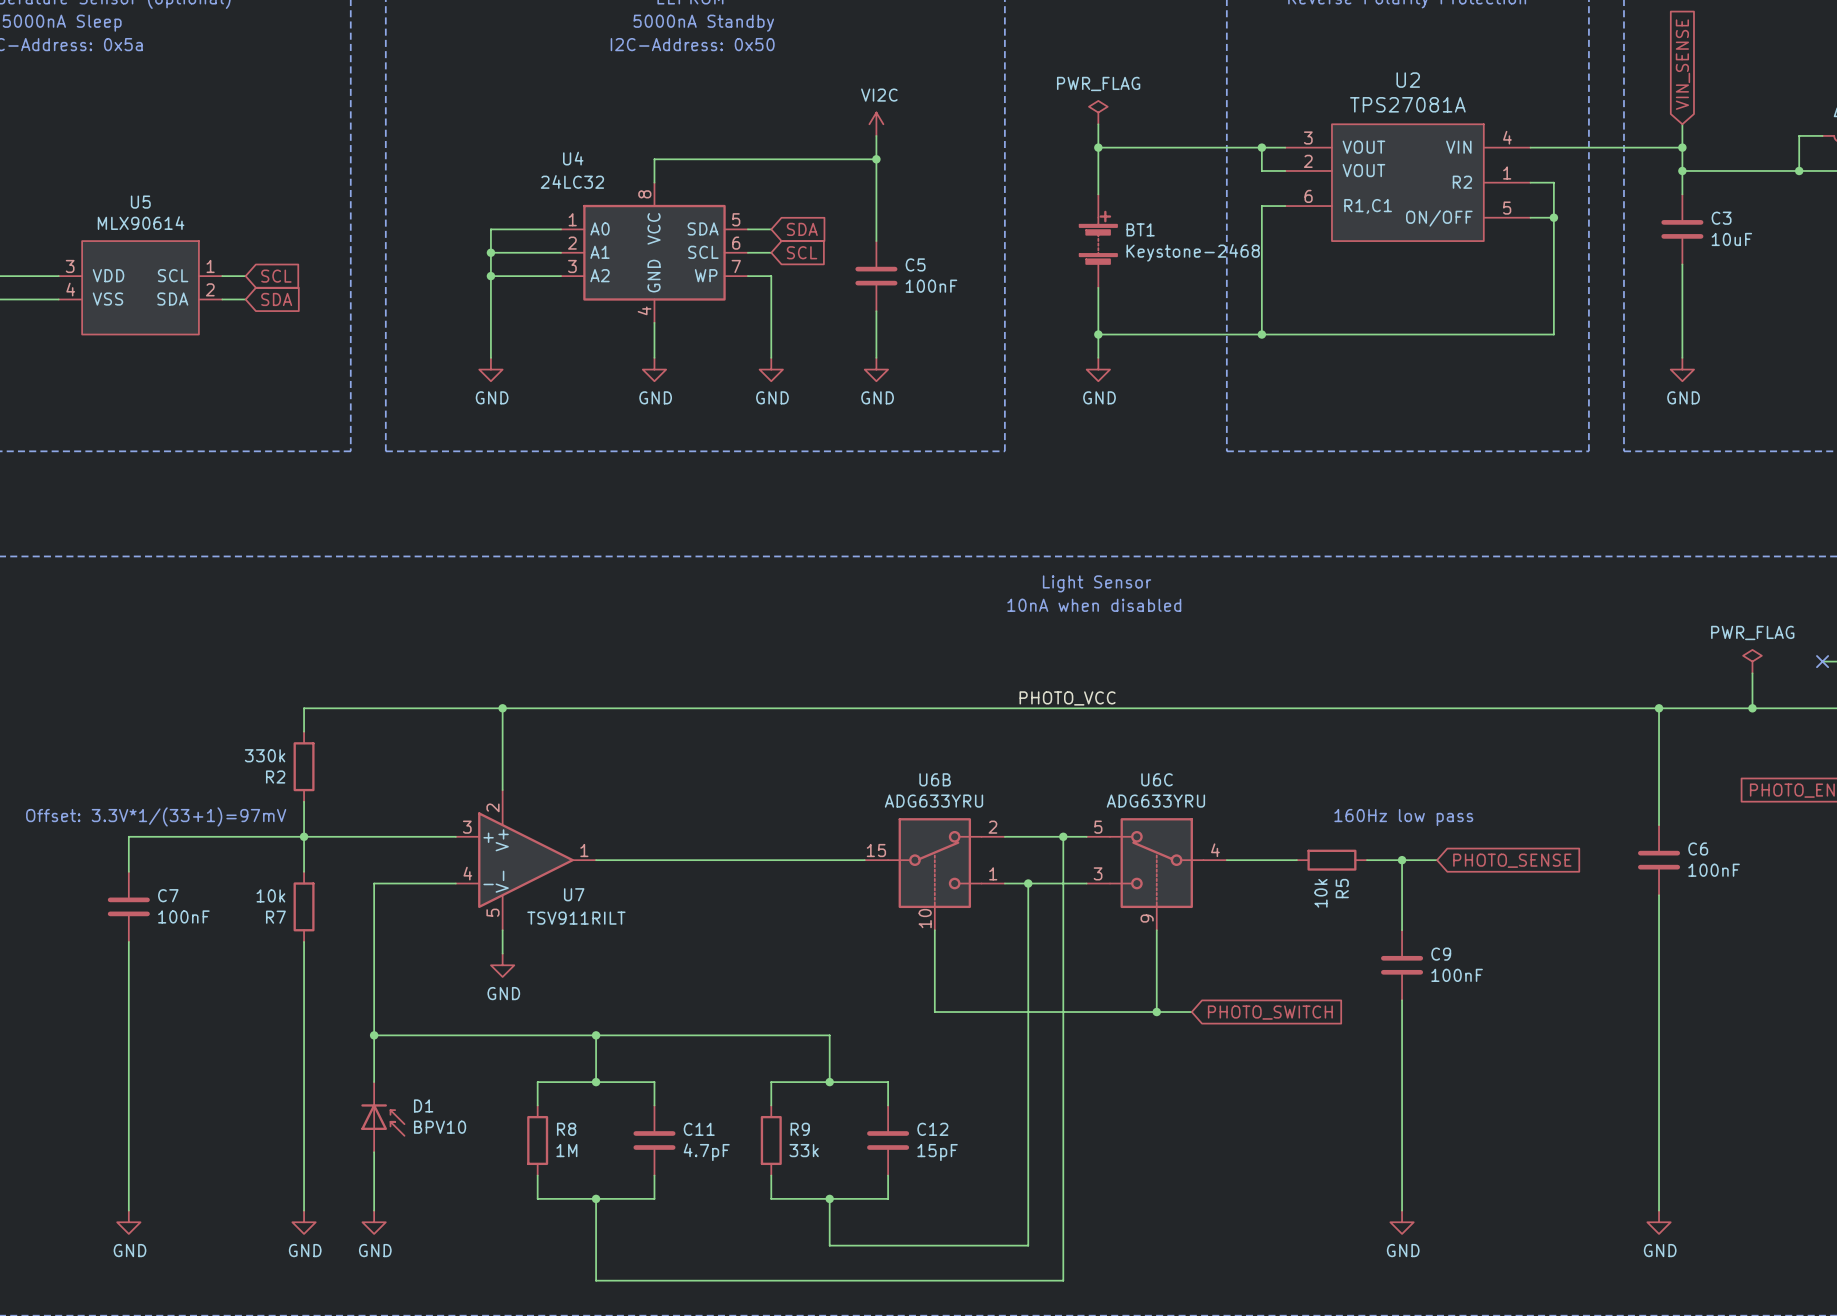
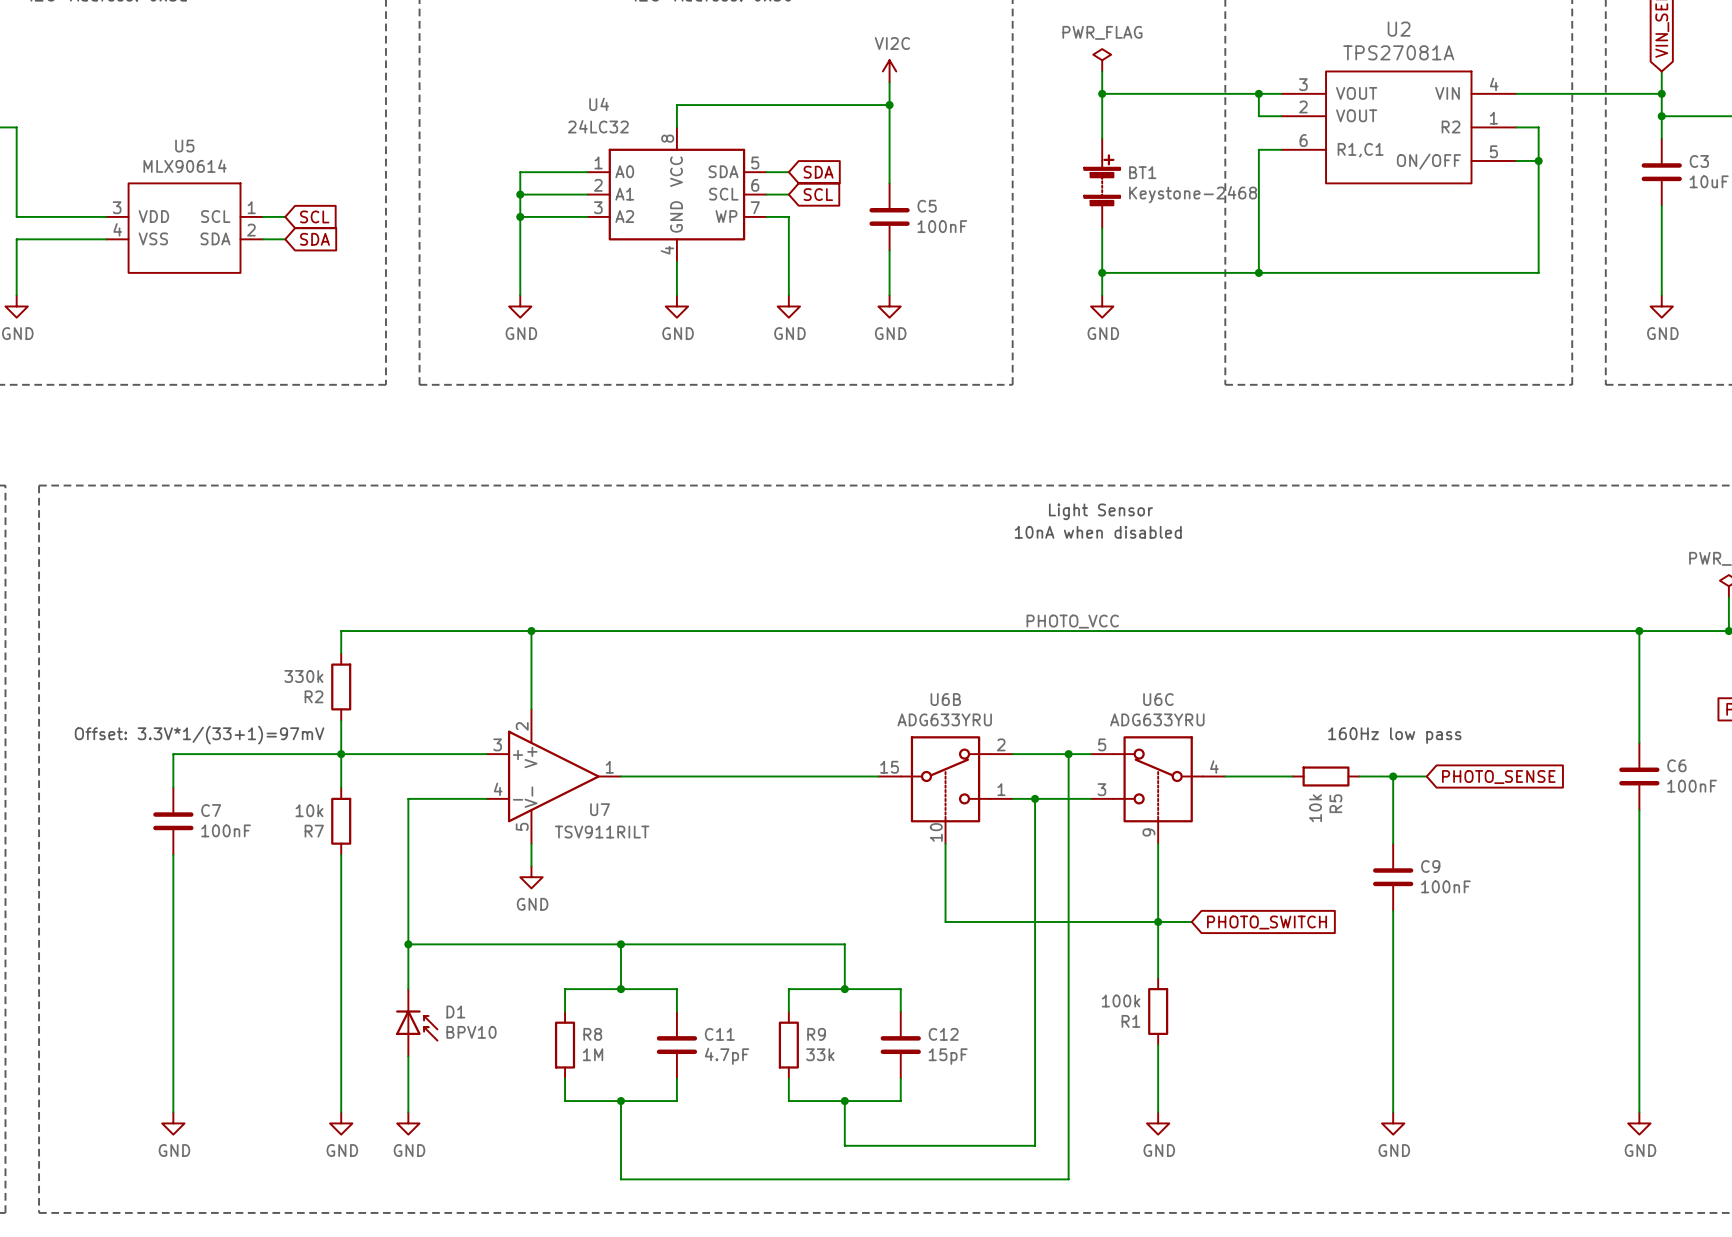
wire: none -> (1158, 921) (1158, 977)
R1: none -> 100k (1158, 1011)
wire: none -> (1158, 1045) (1158, 1112)
power symbol: none -> GND (1158, 1123)

